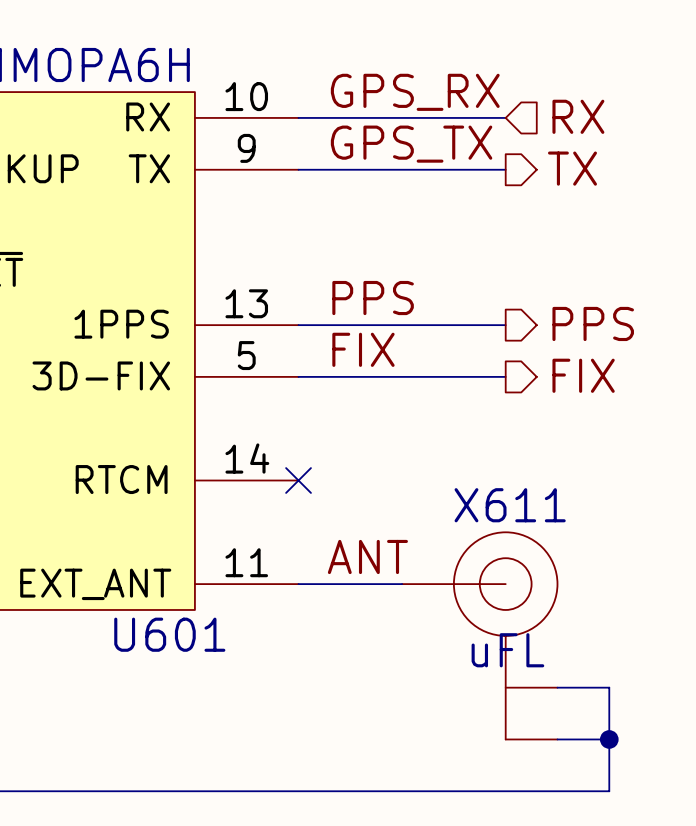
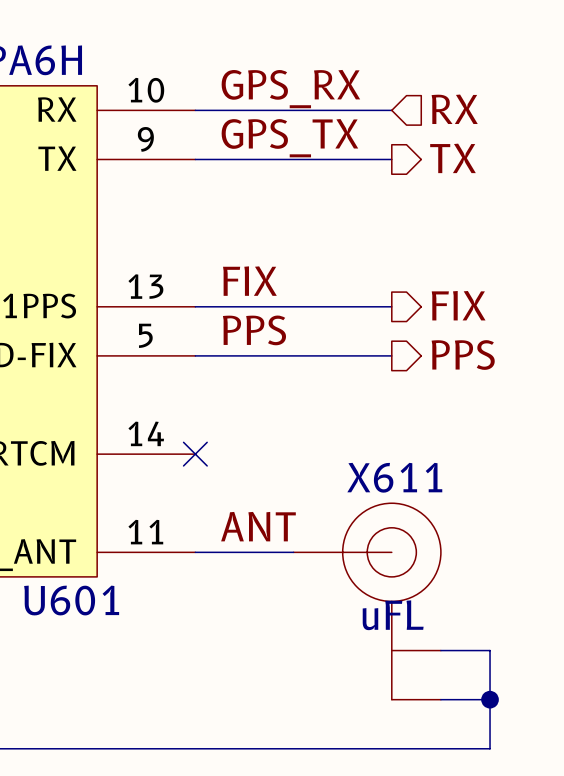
label: PPS (373, 298) -> FIX (249, 281)
hierarchical label: PPS (593, 323) -> FIX (458, 305)
label: FIX (363, 349) -> PPS (254, 330)
hierarchical label: FIX (583, 375) -> PPS (463, 355)

